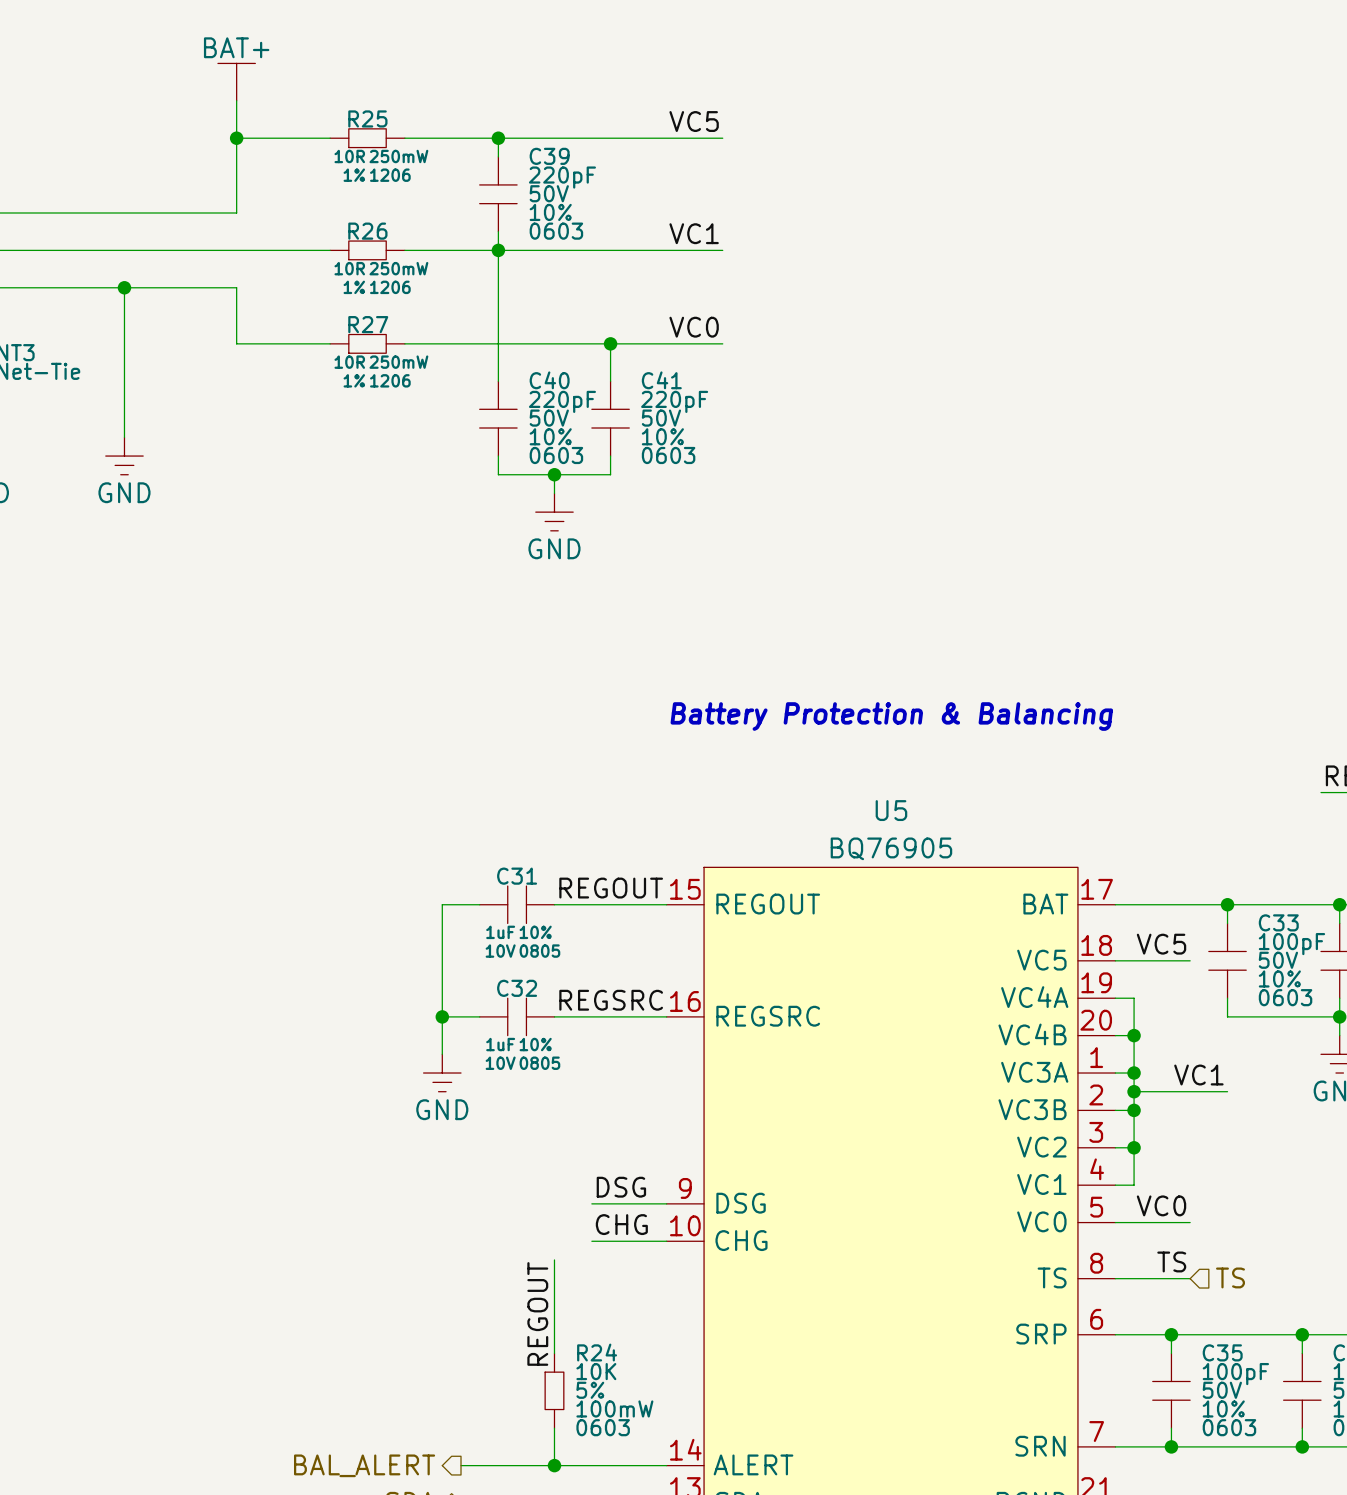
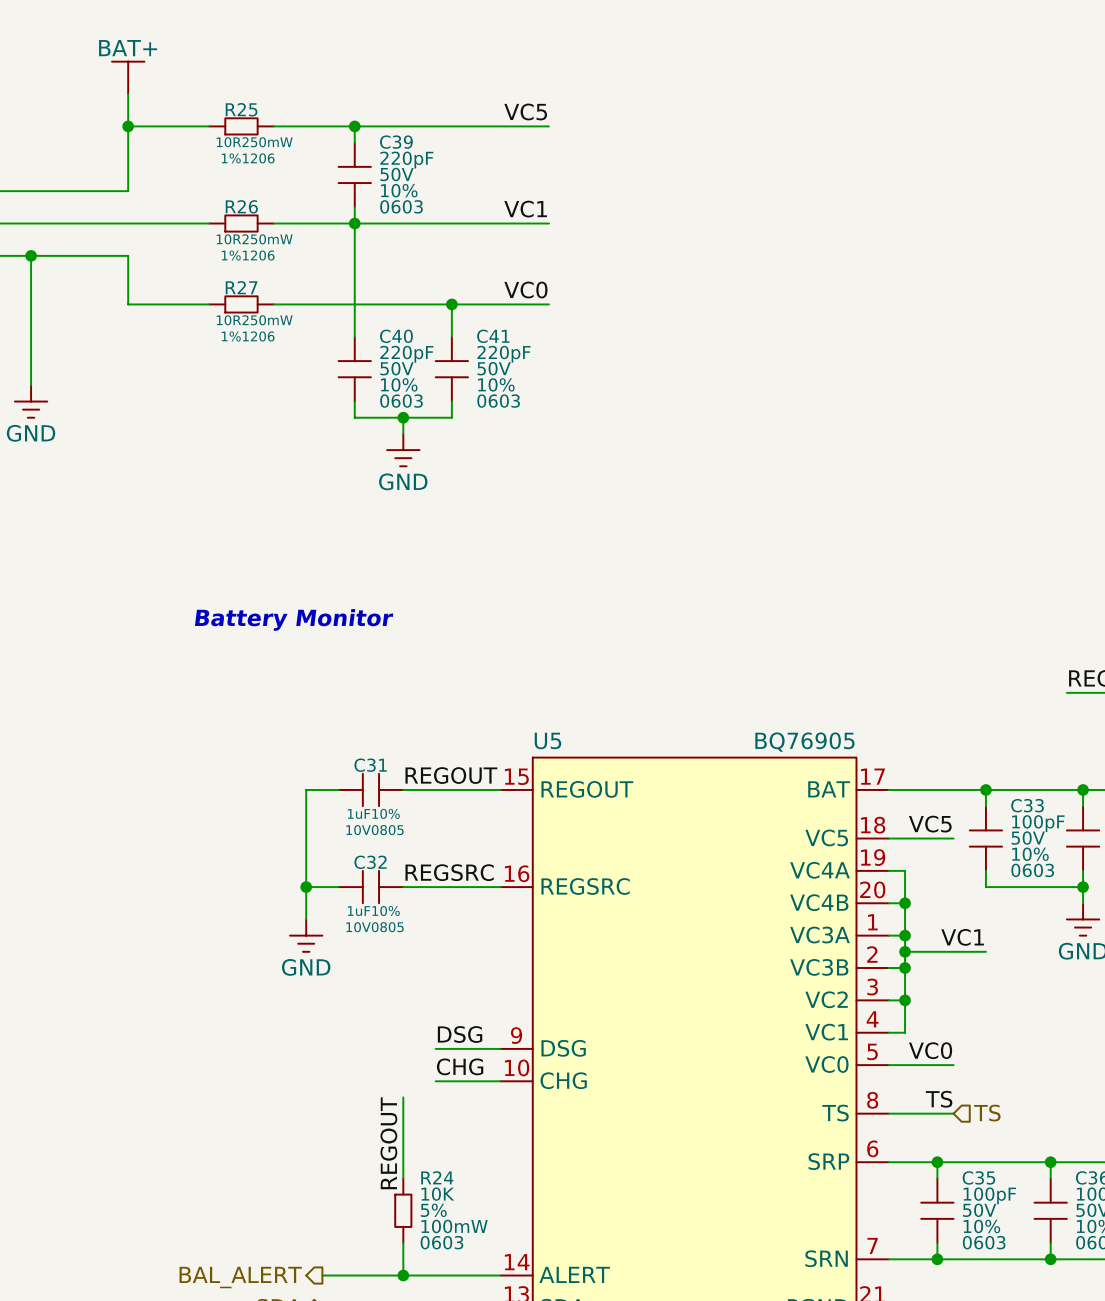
text: none -> Battery Monitor (294, 619)
text: Battery Protection & Balancing (891, 716) -> none
U5 name position: U5 (891, 810) -> U5 (547, 740)
U5 value position: BQ76905 (891, 848) -> BQ76905 (804, 742)

